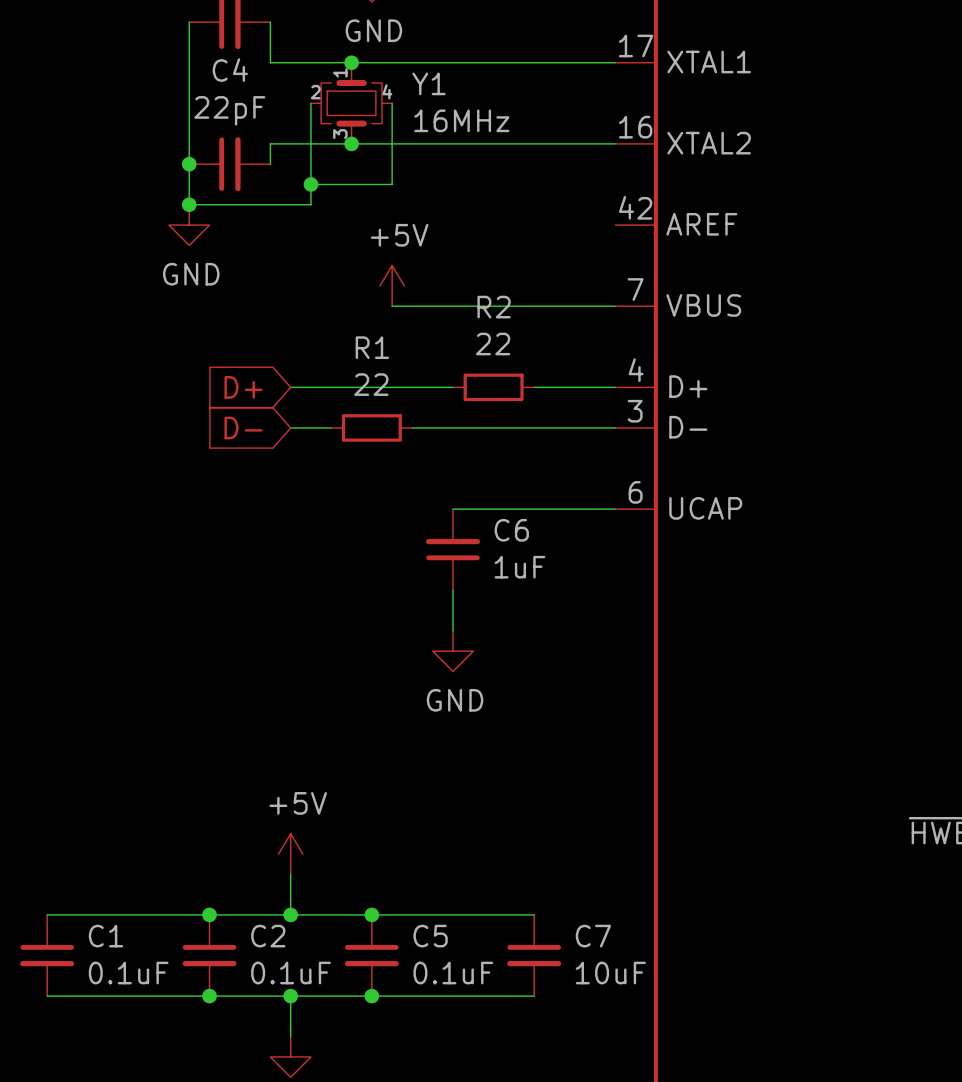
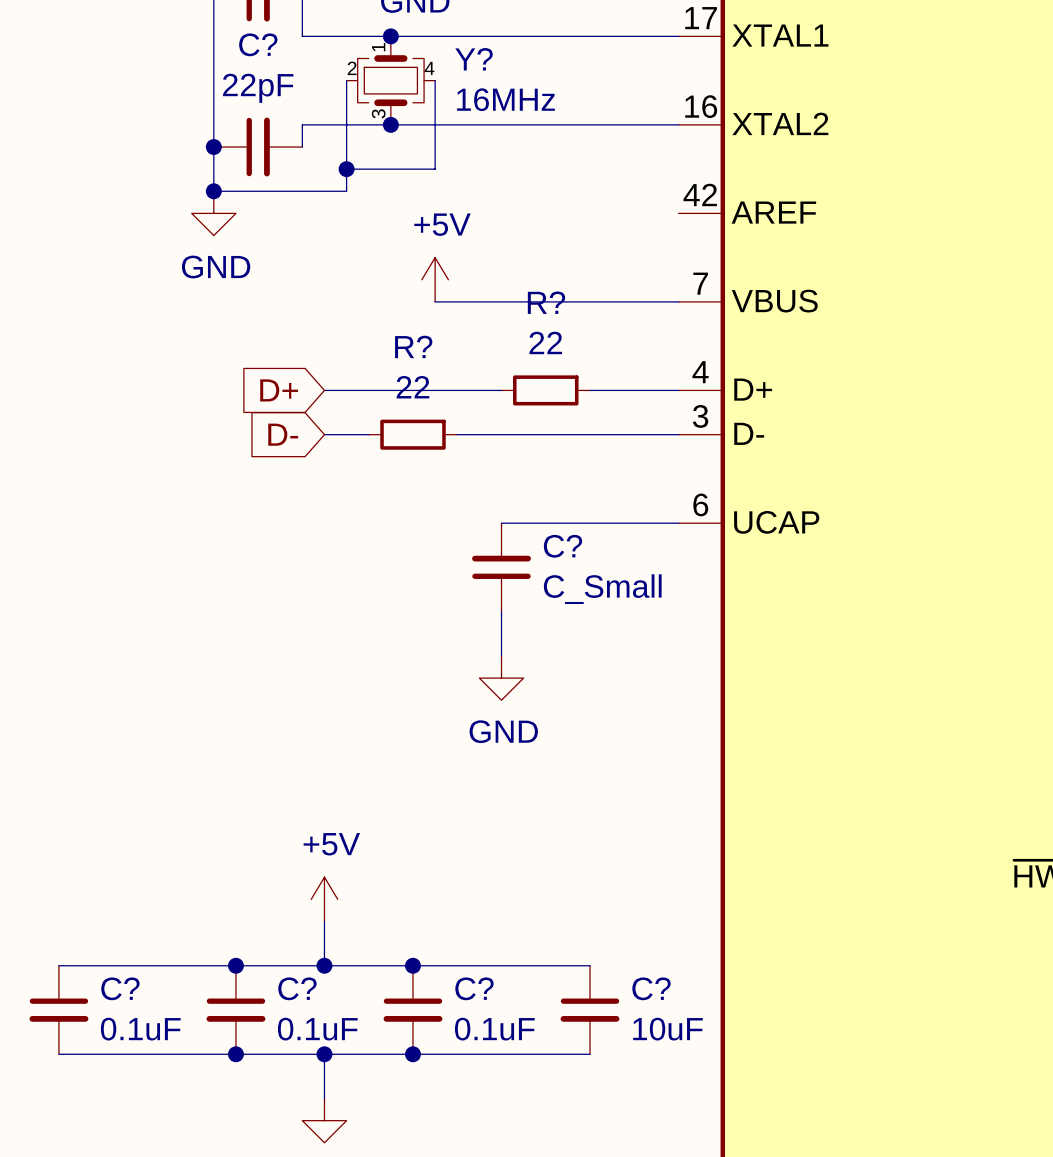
C4 name: C4 (230, 70) -> C? (258, 44)
Y1 name: Y1 (428, 83) -> Y? (474, 59)
R2 name: R2 (494, 307) -> R? (546, 302)
R1 name: R1 (372, 347) -> R? (413, 346)
C6 name: C6 (511, 530) -> C? (562, 546)
C6 value: 1uF (519, 567) -> C_Small (602, 589)
C1 name: C1 (105, 936) -> C? (120, 988)
C2 name: C2 (268, 936) -> C? (297, 988)
C5 name: C5 (430, 936) -> C? (474, 988)
C7 name: C7 (593, 936) -> C? (651, 988)

